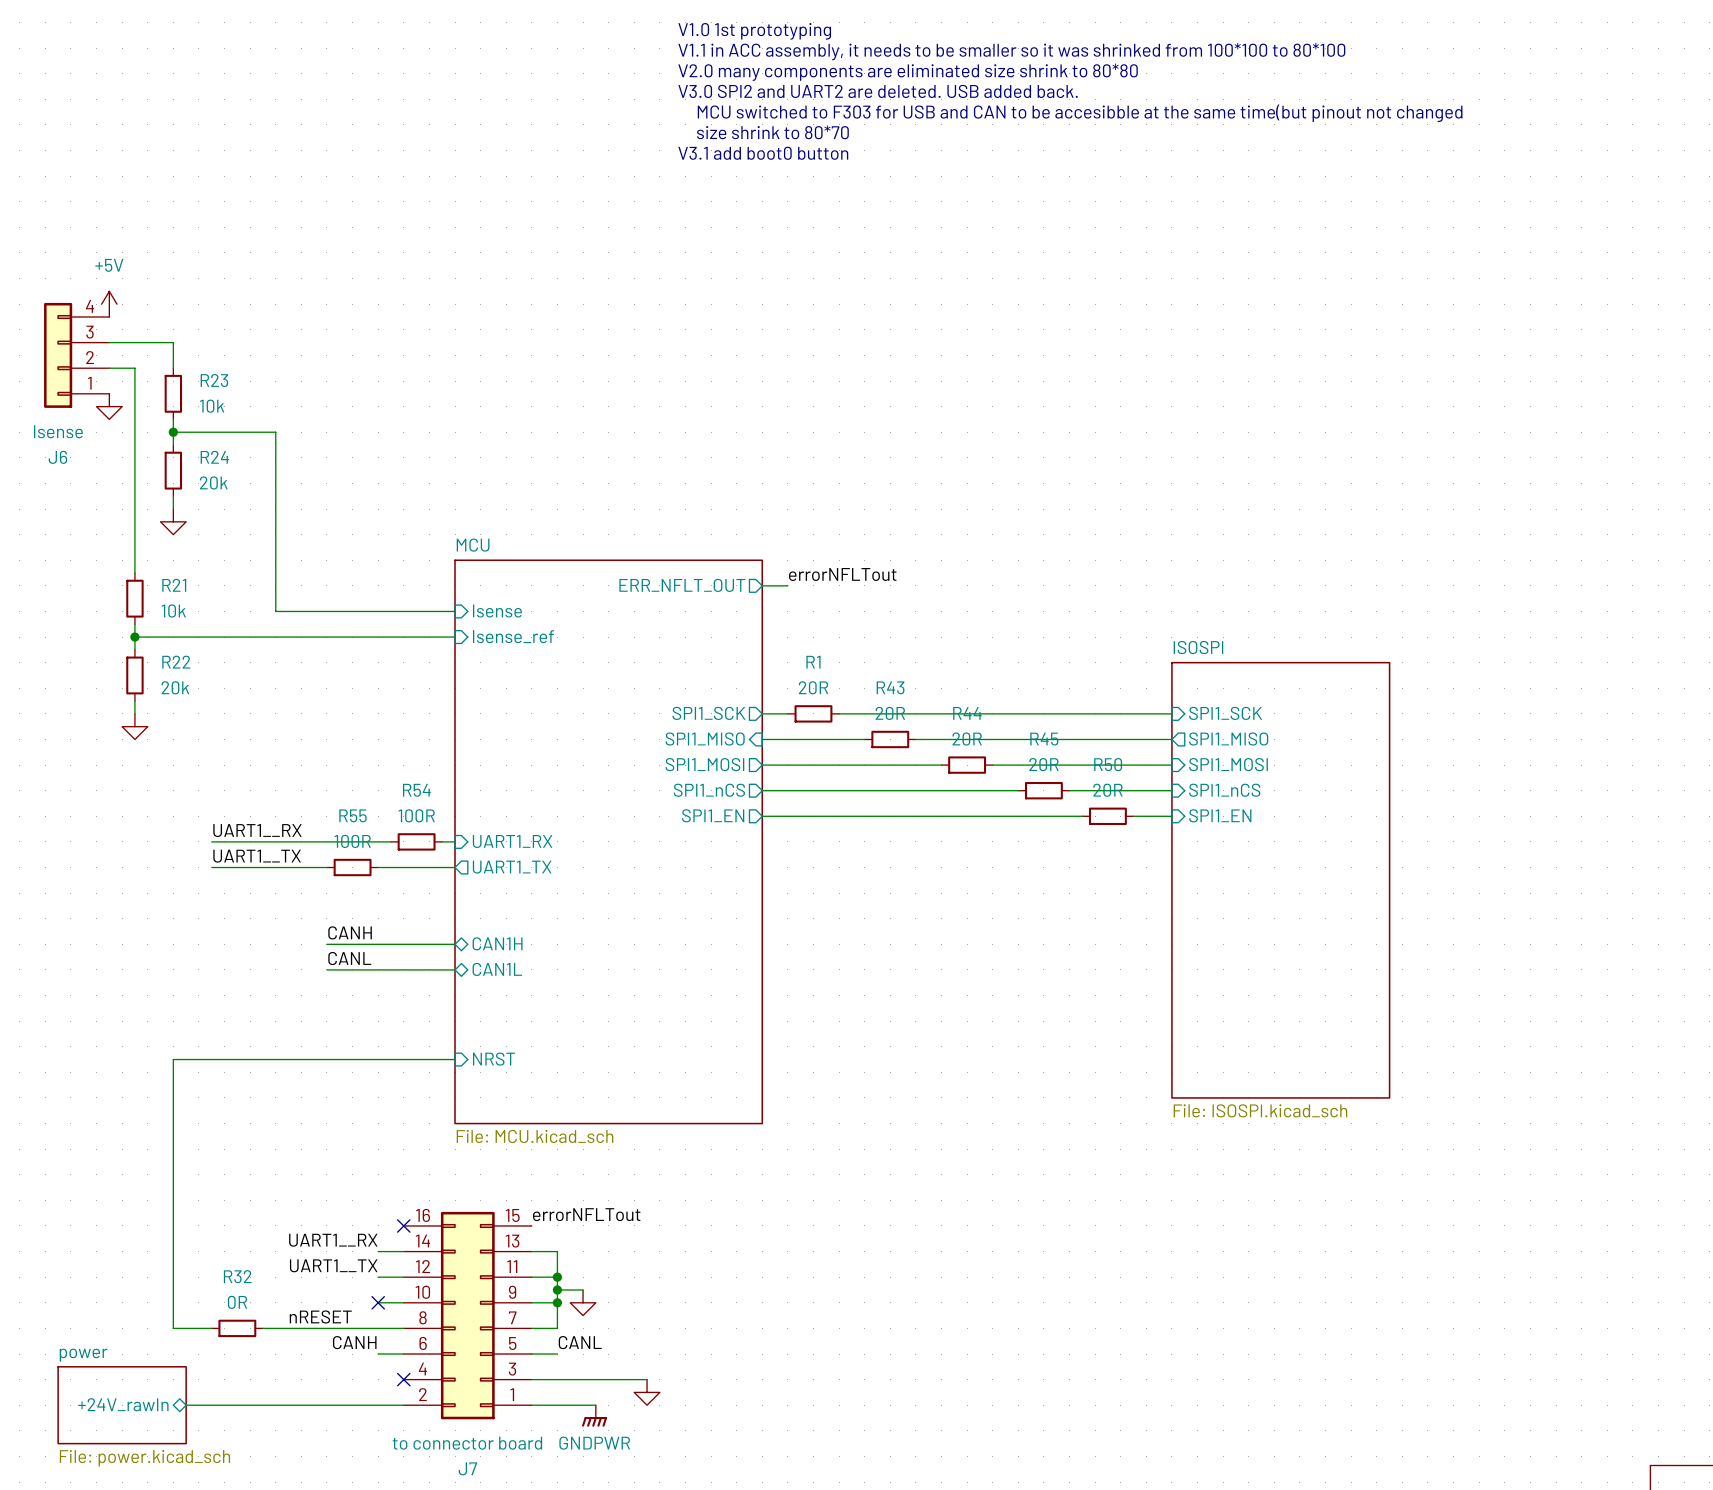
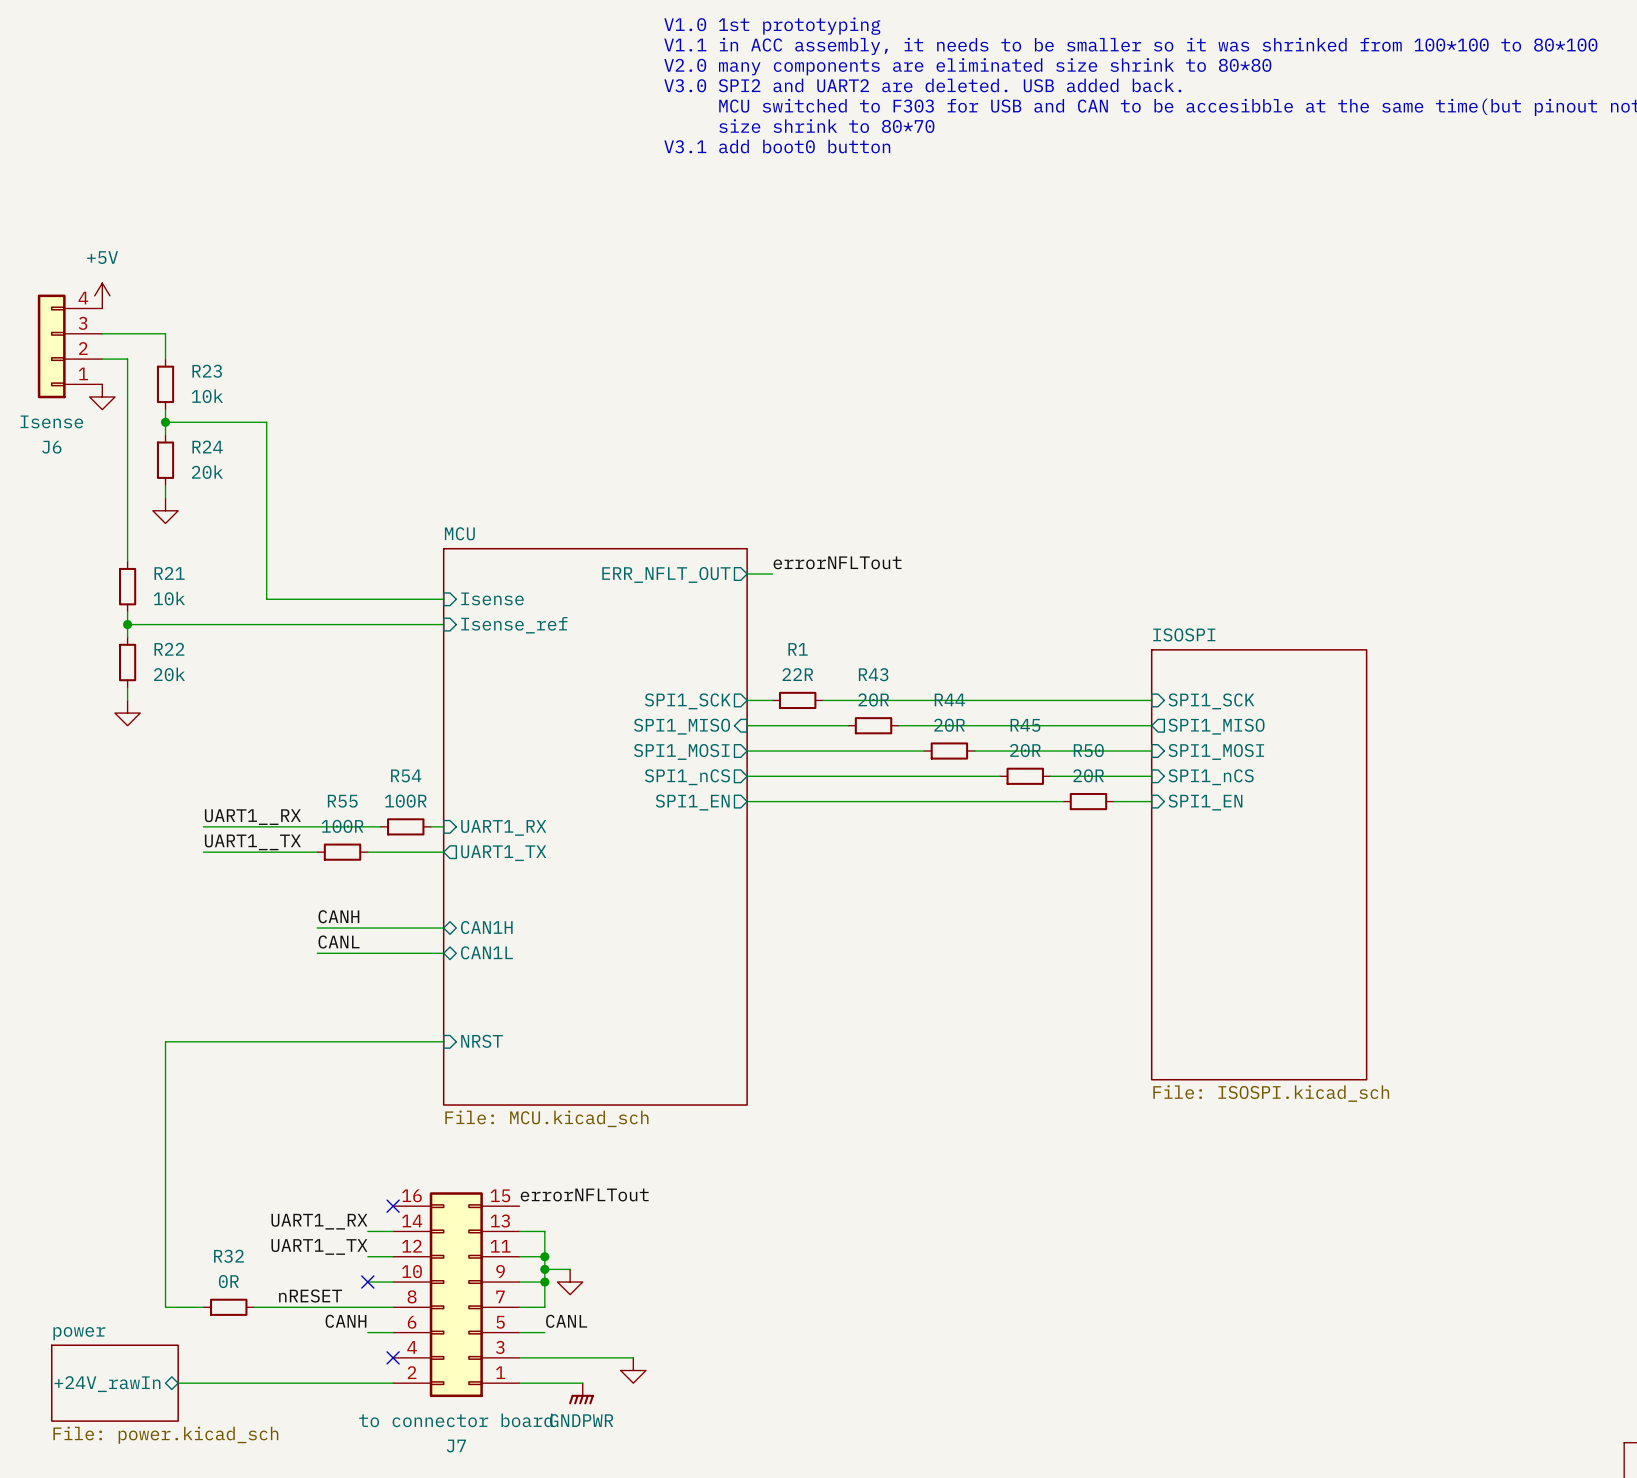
R1 value: 20R (813, 687) -> 22R (797, 674)

